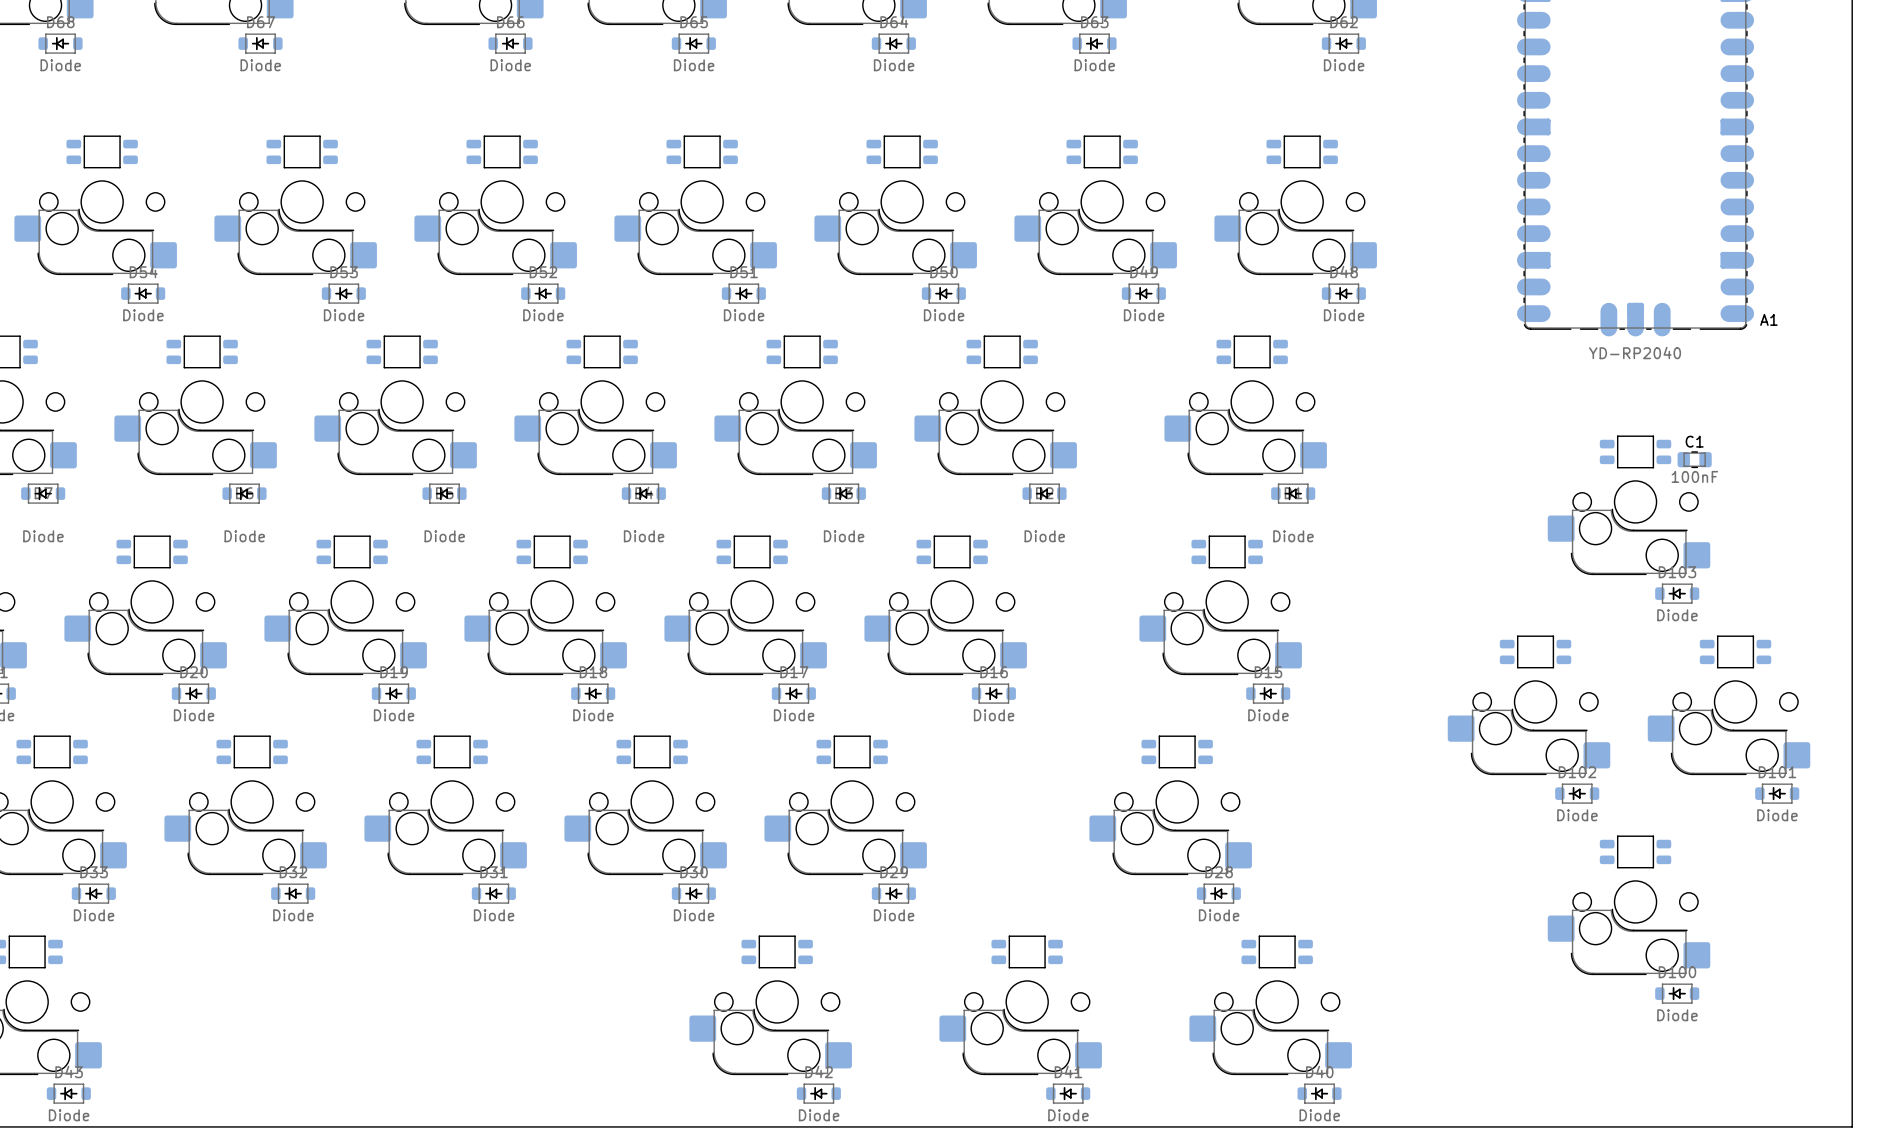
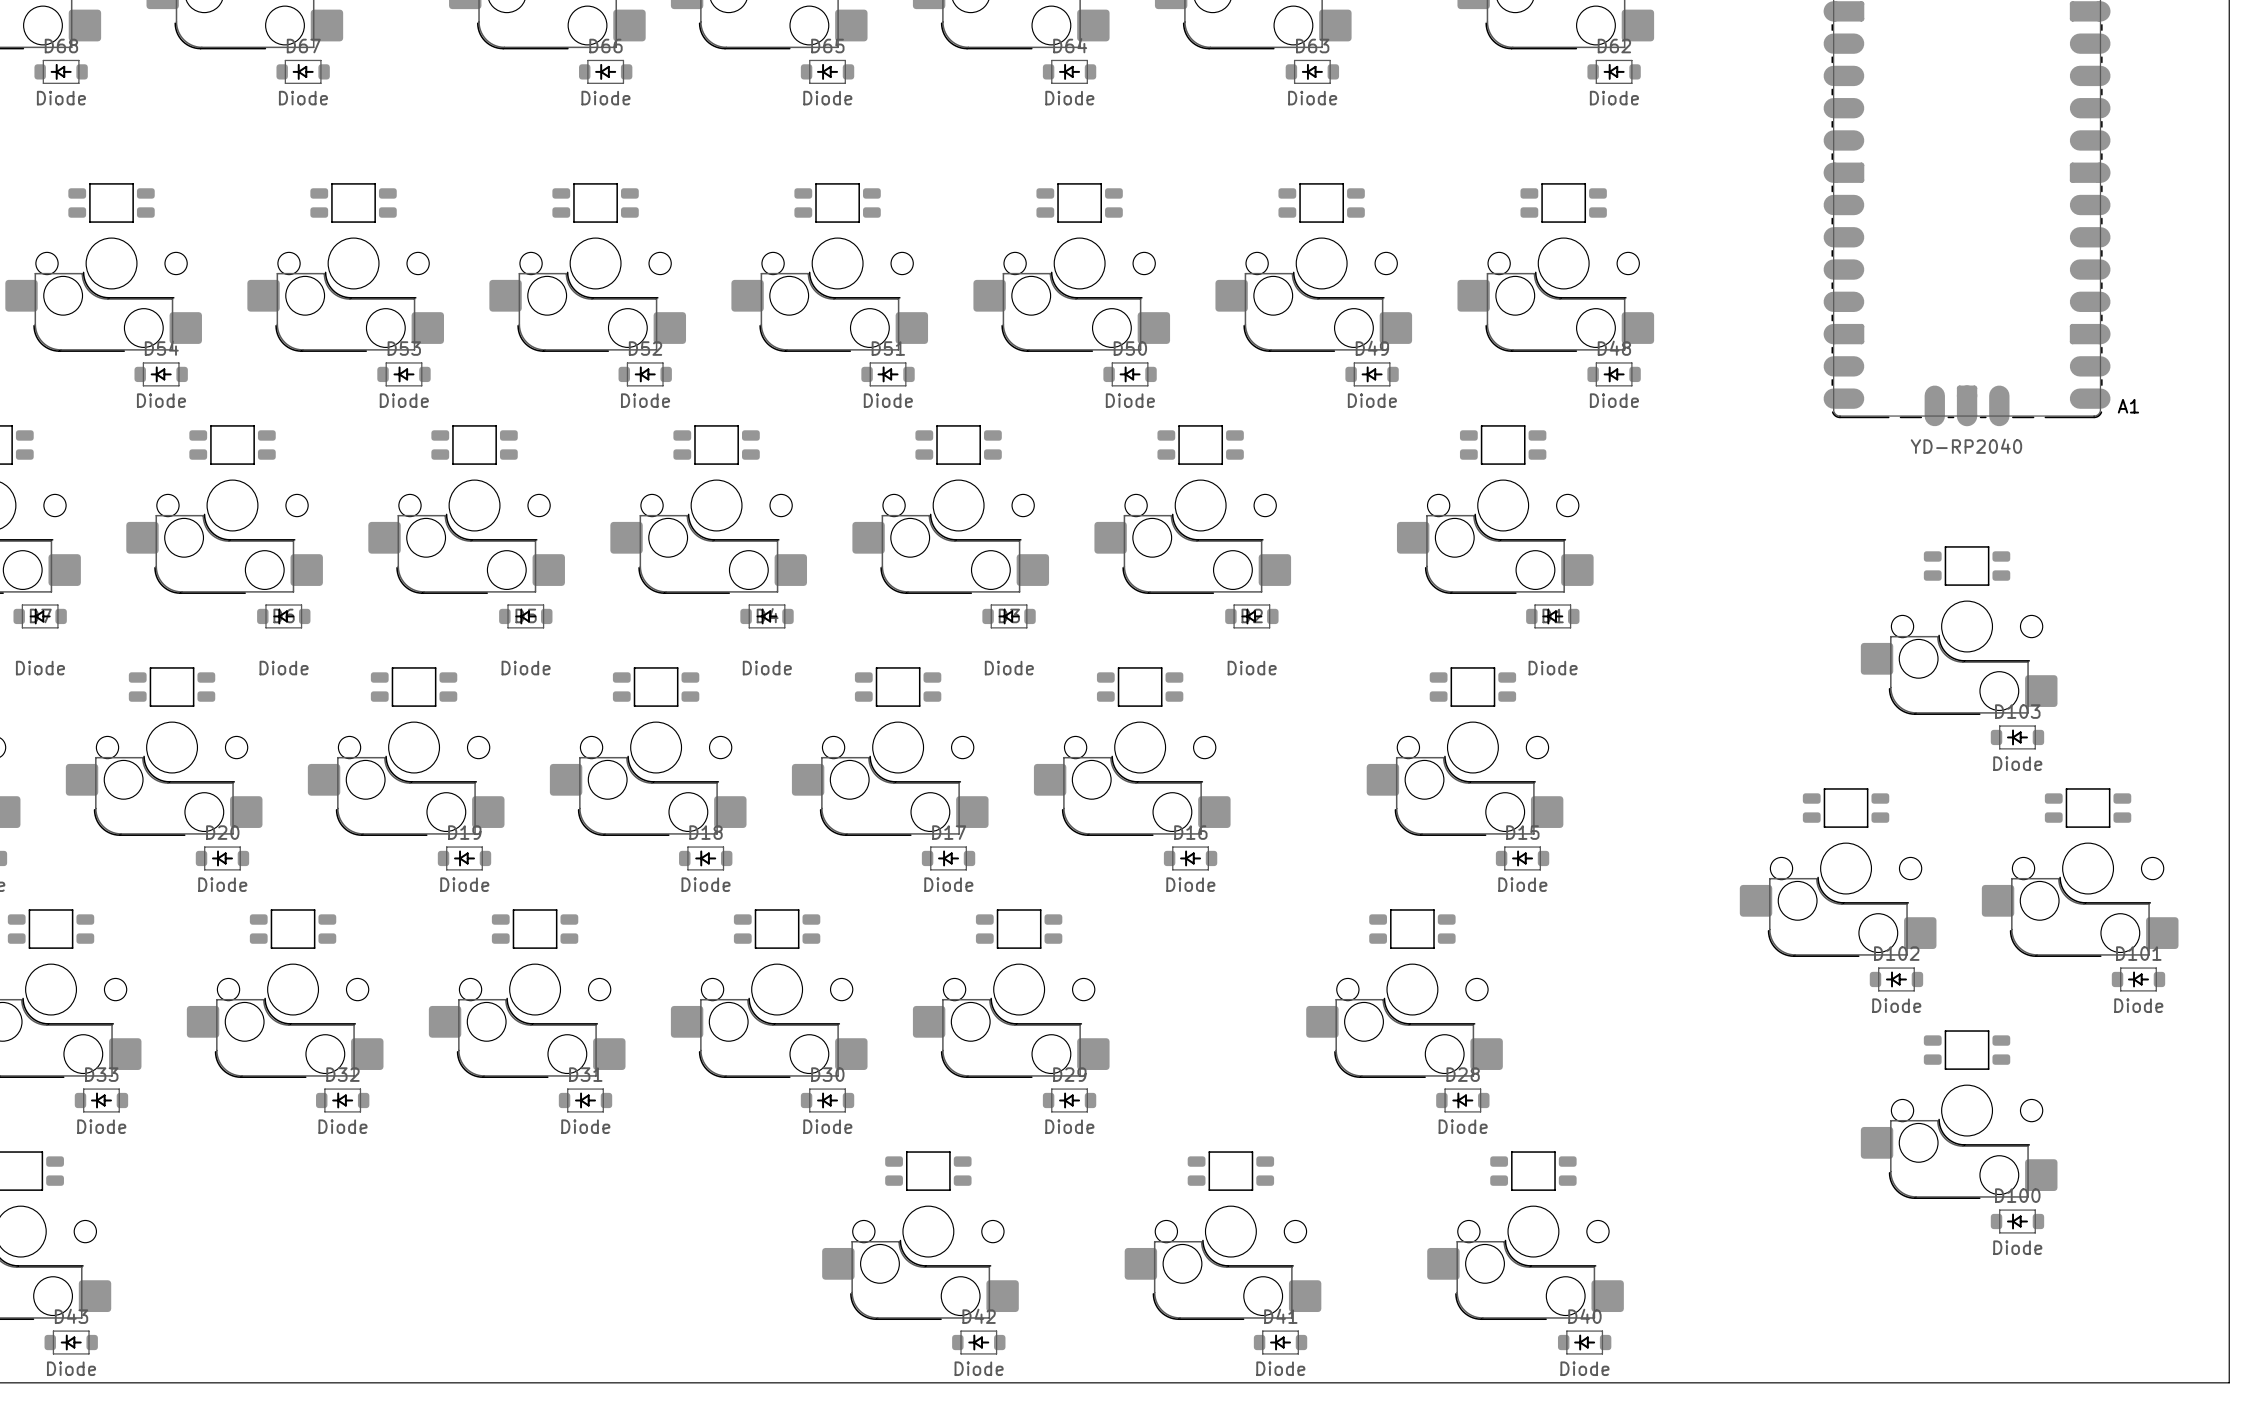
C1: 100nF (1694, 459) -> none

